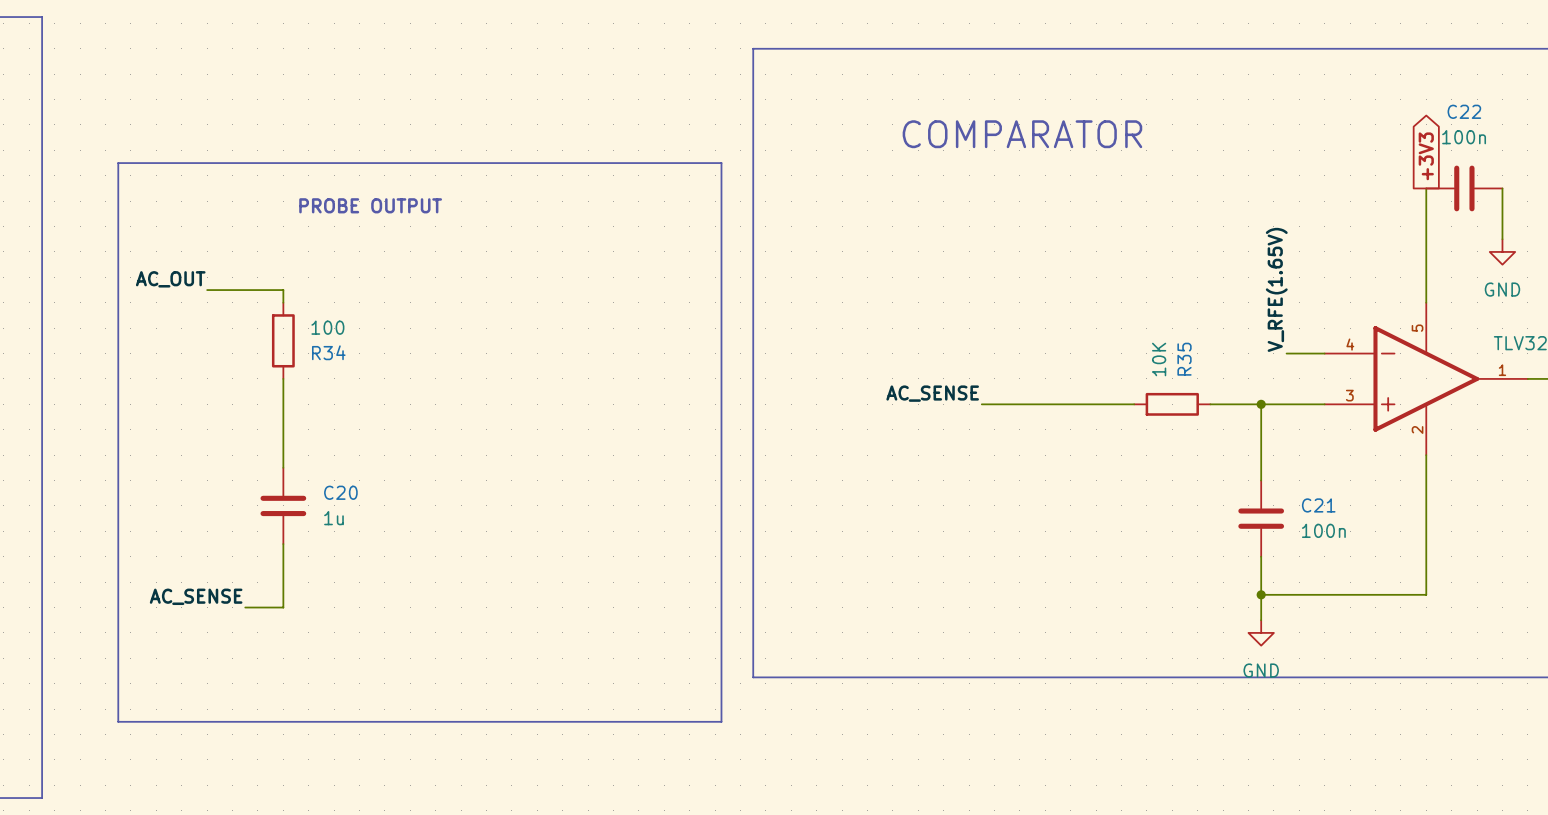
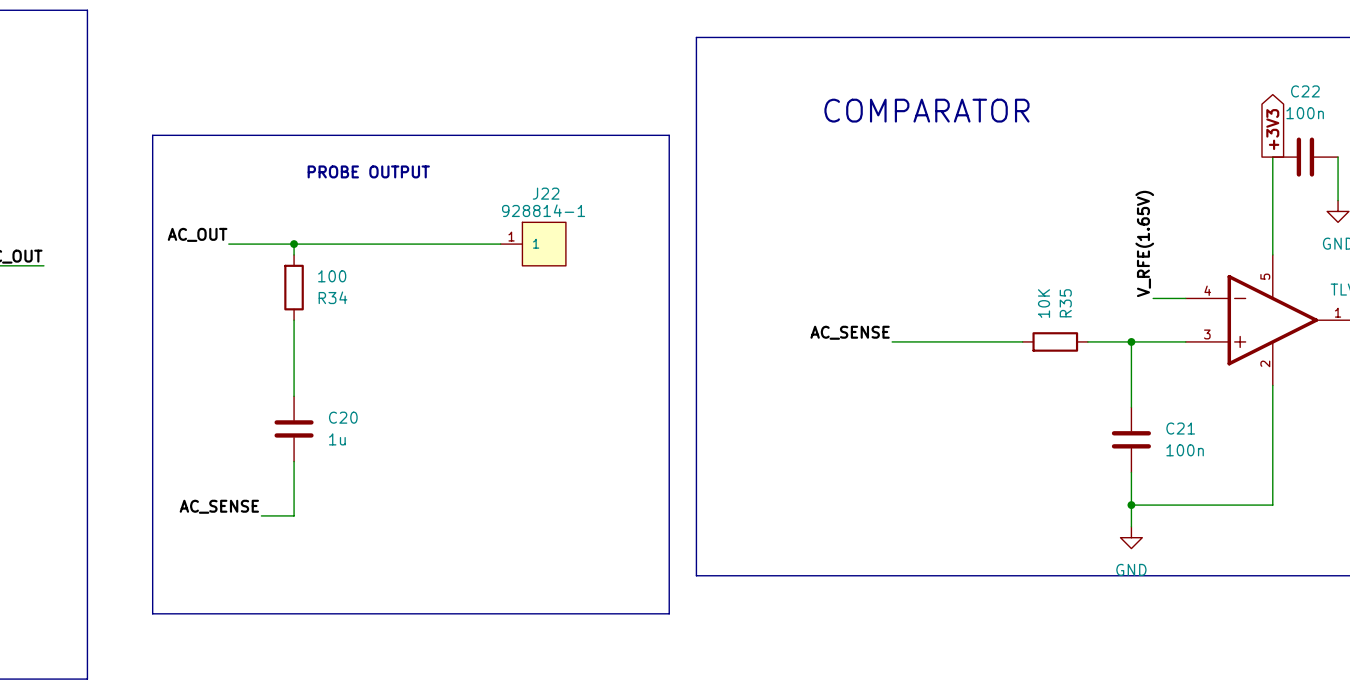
wire: none -> (294, 244) (500, 244)
junction: none -> (294, 244)
J22: none -> 928814-1 (533, 244)

